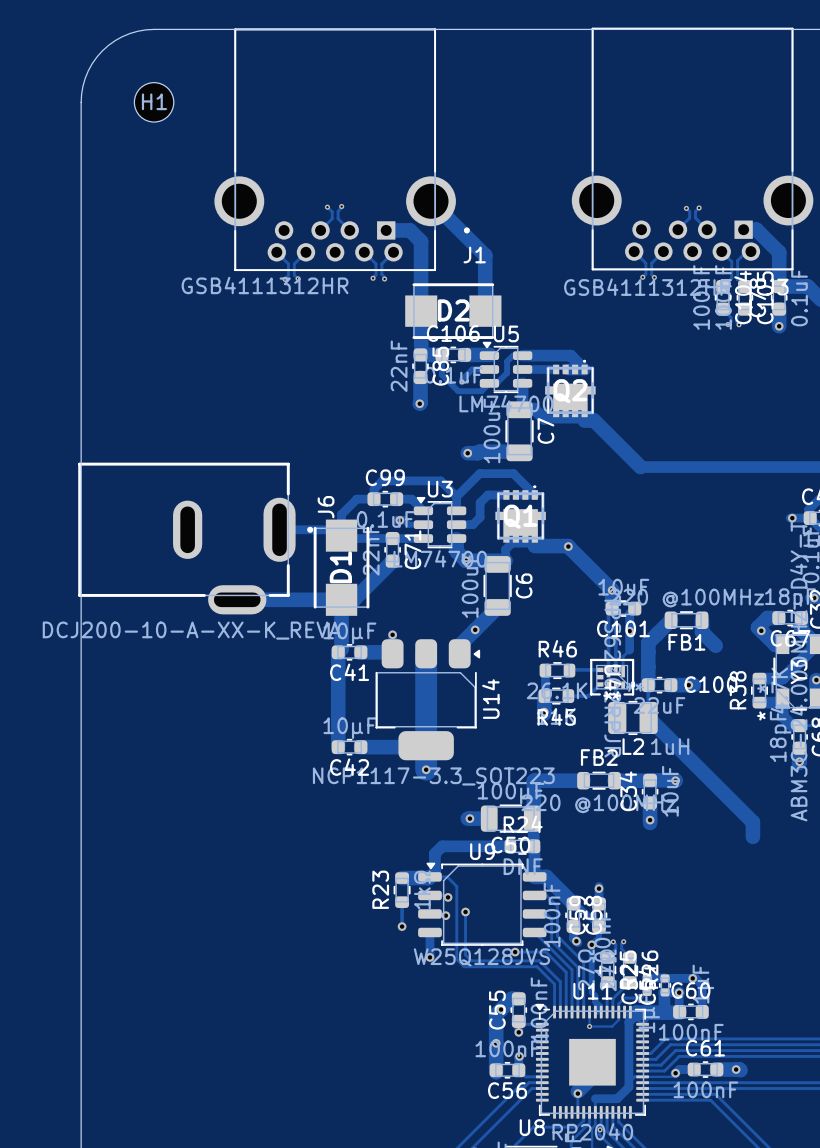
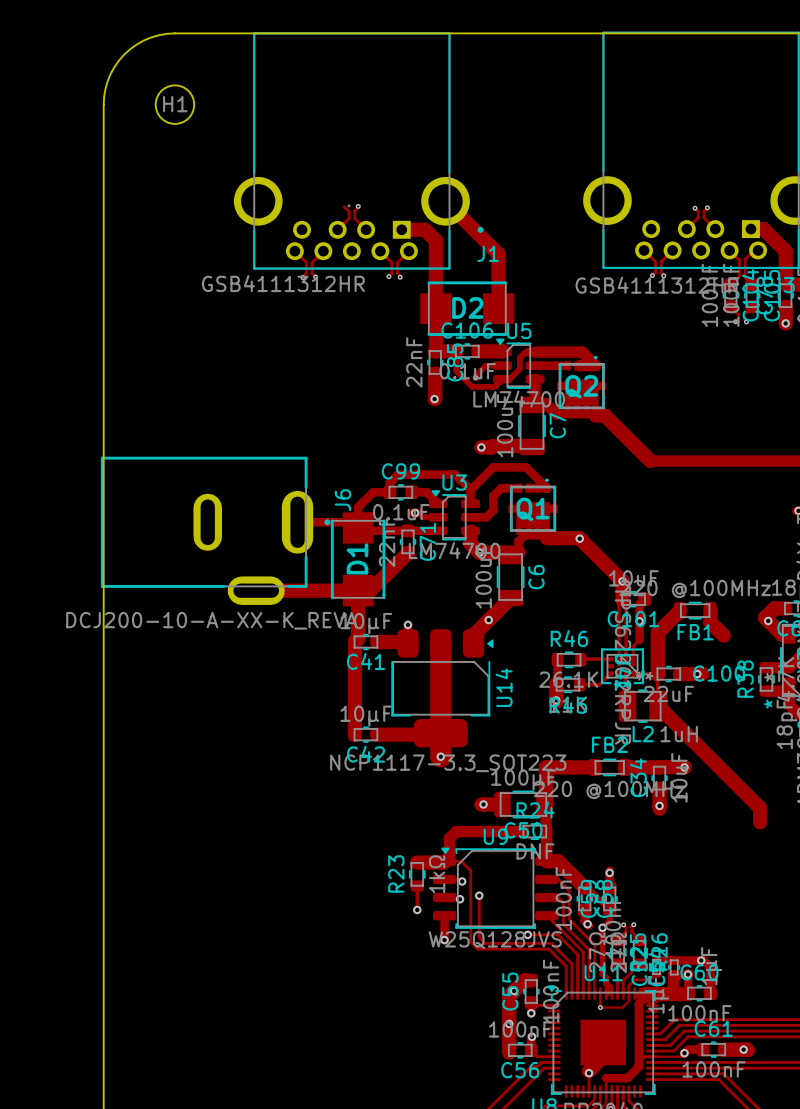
via: none -> (349, 205)
via: (327, 207) -> none

